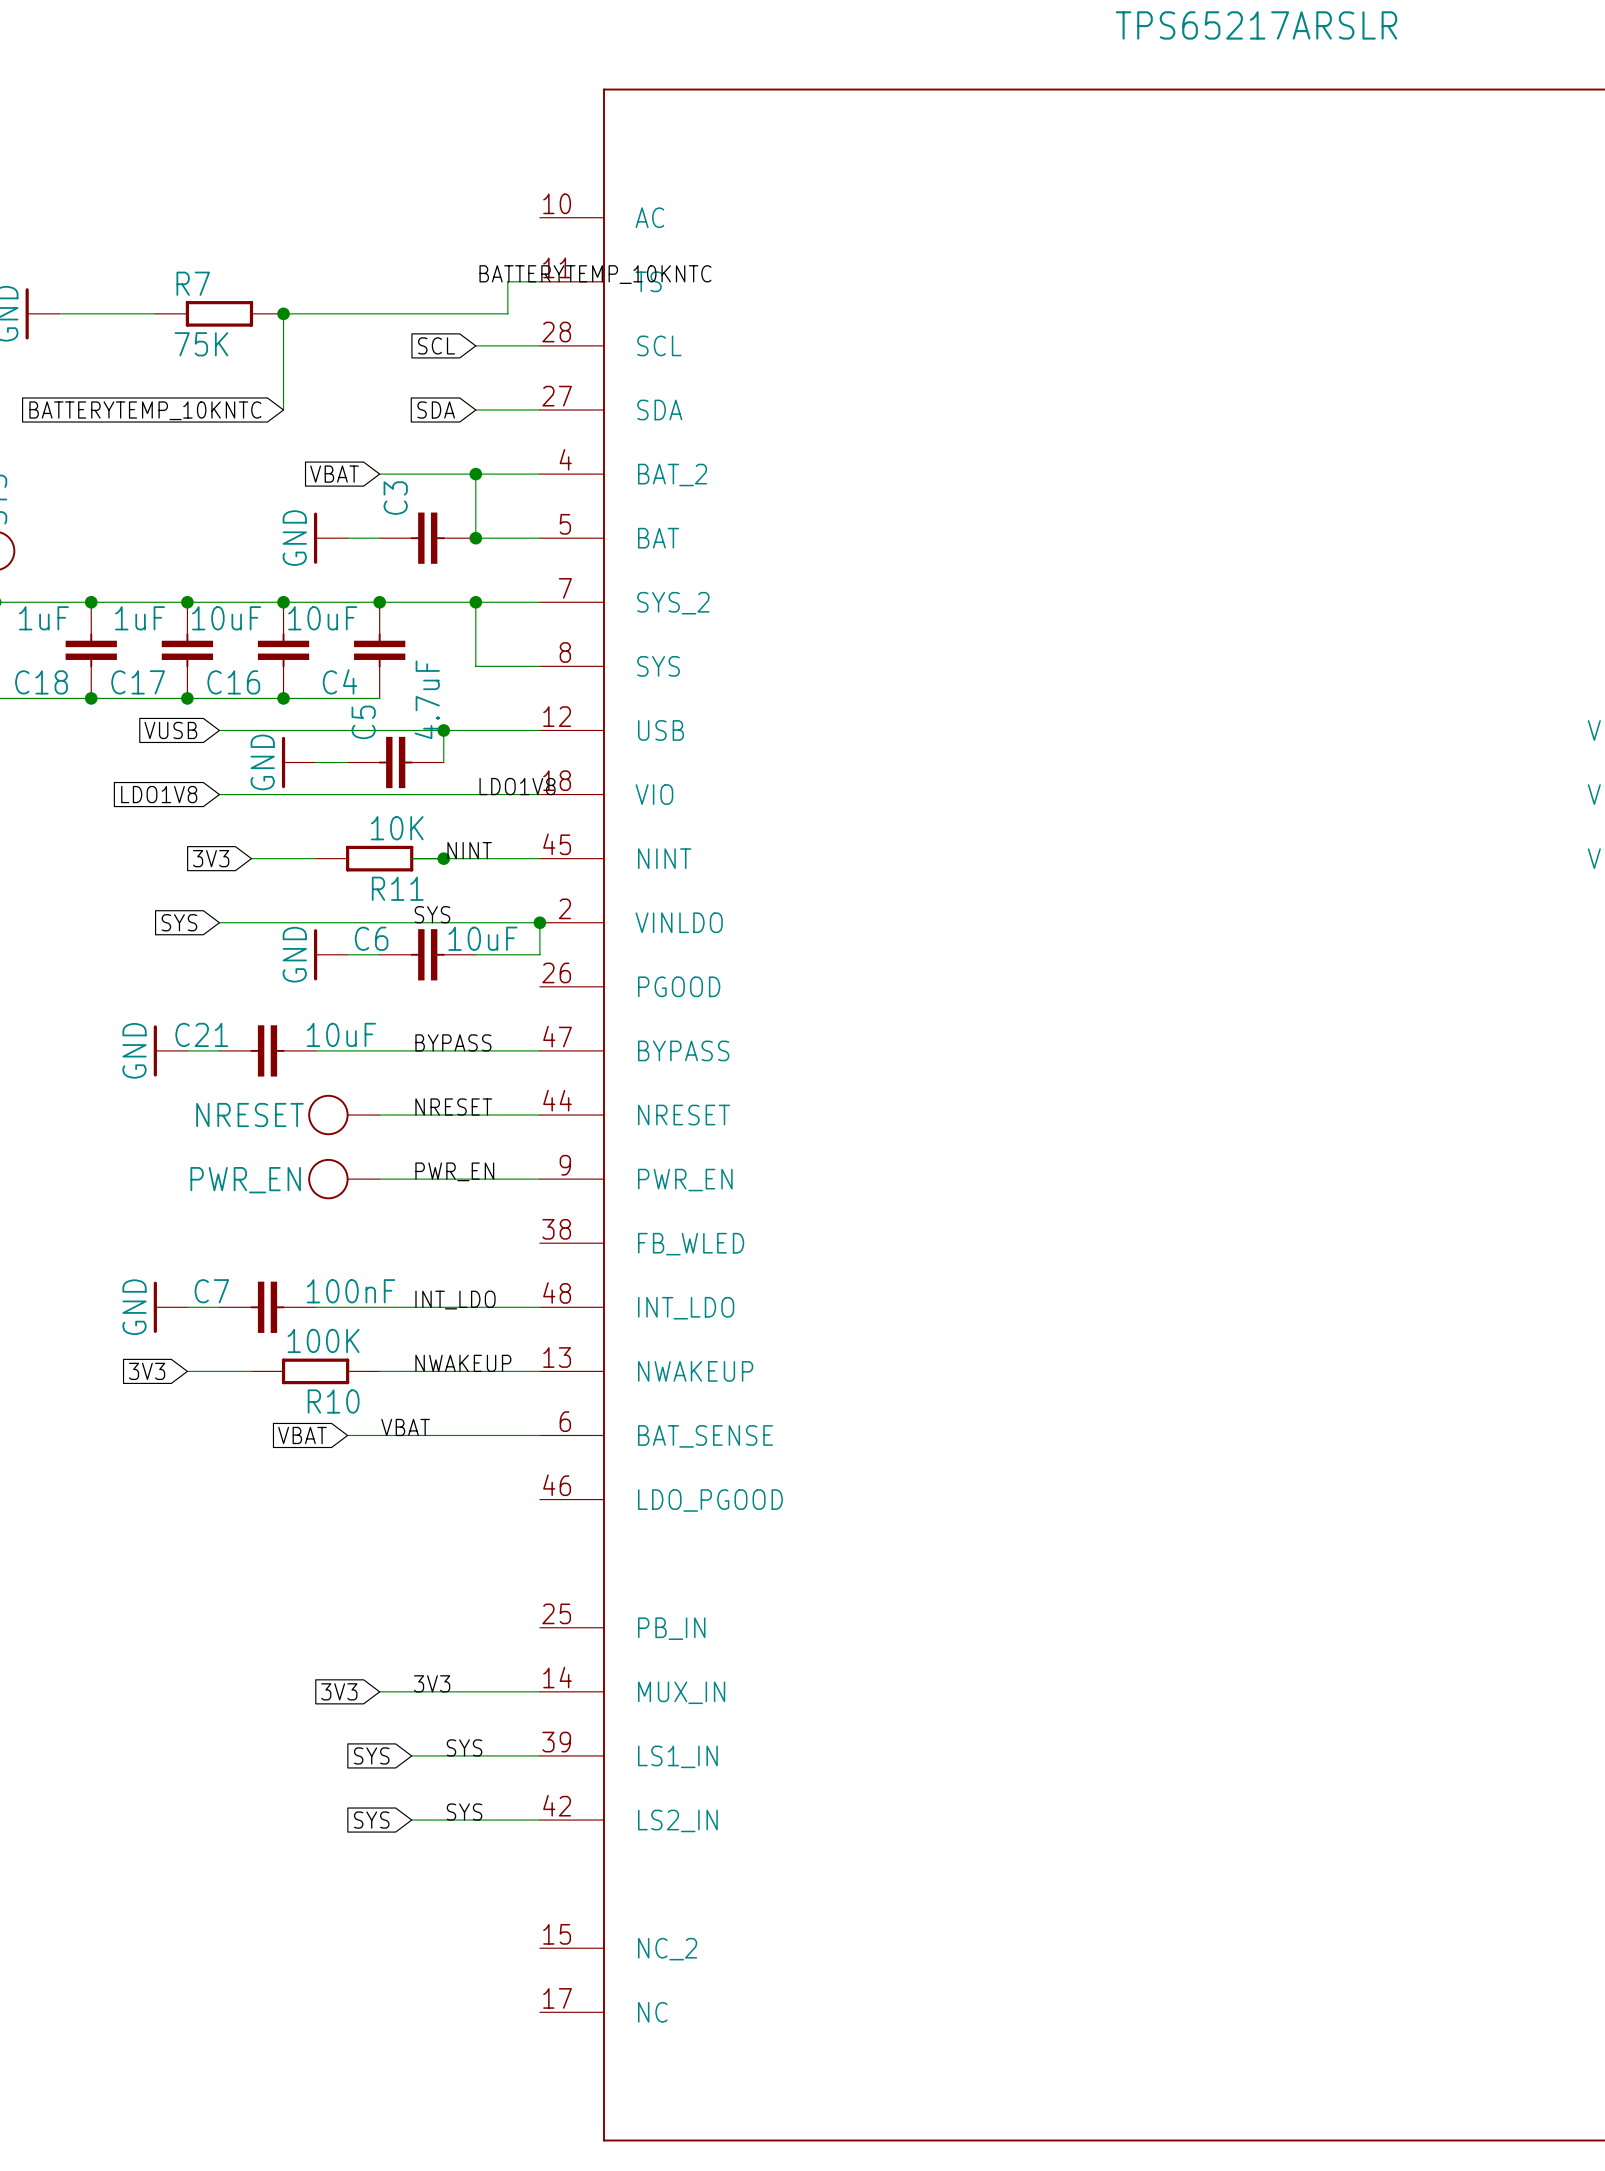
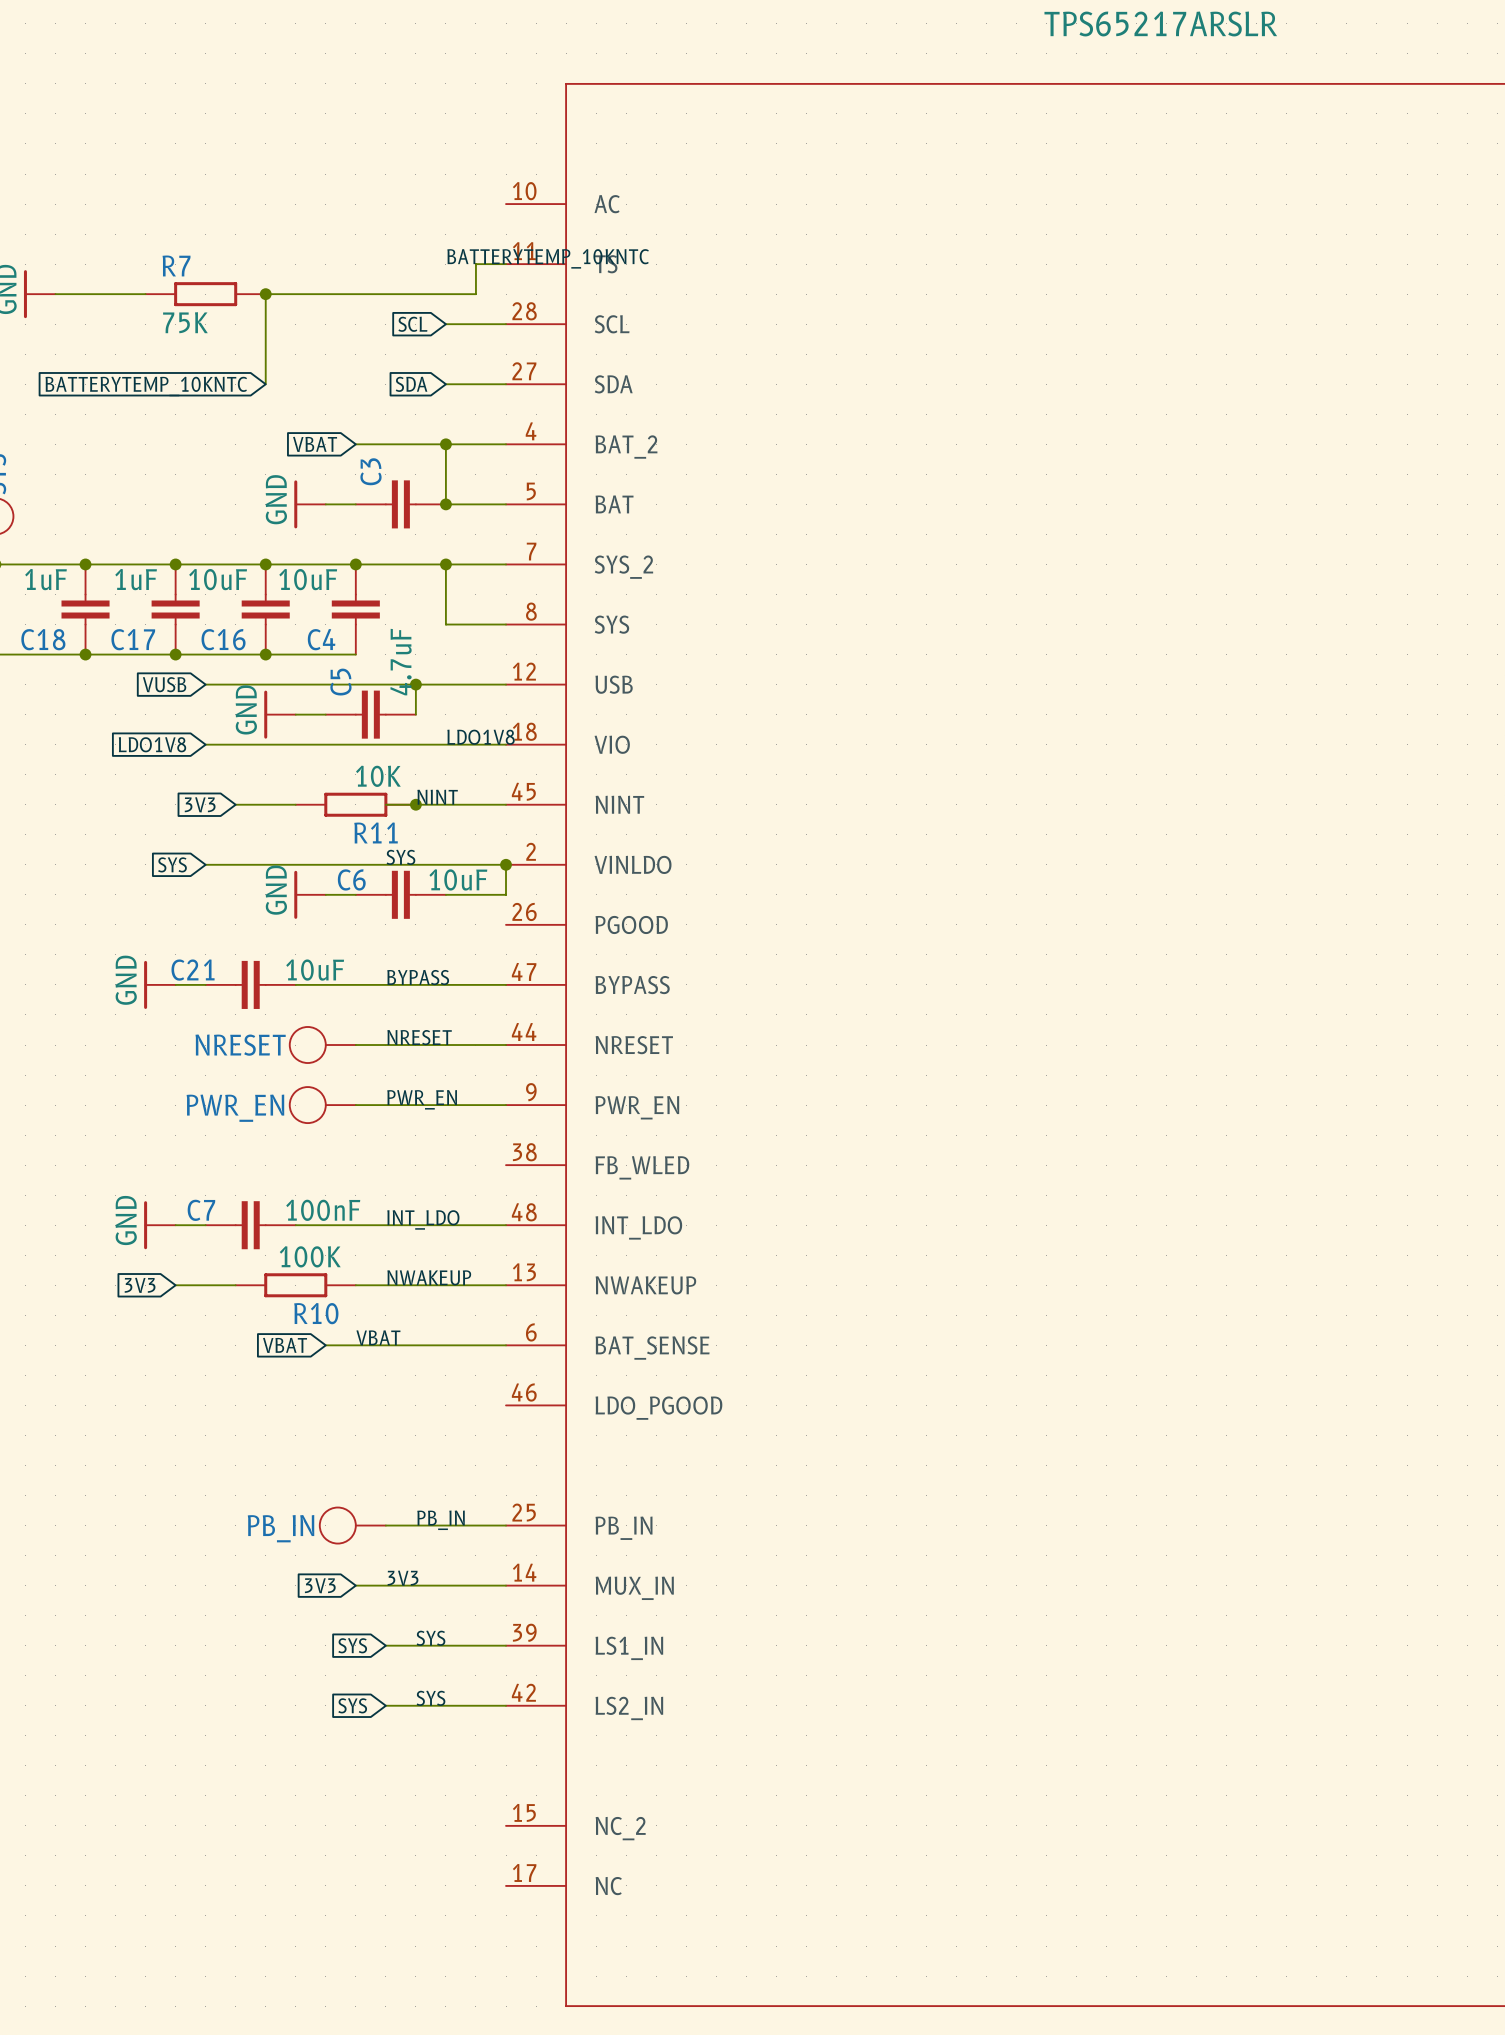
label: none -> PB_IN (441, 1520)
PB_IN: none -> (352, 1525)
wire: none -> (385, 1525) (506, 1525)

